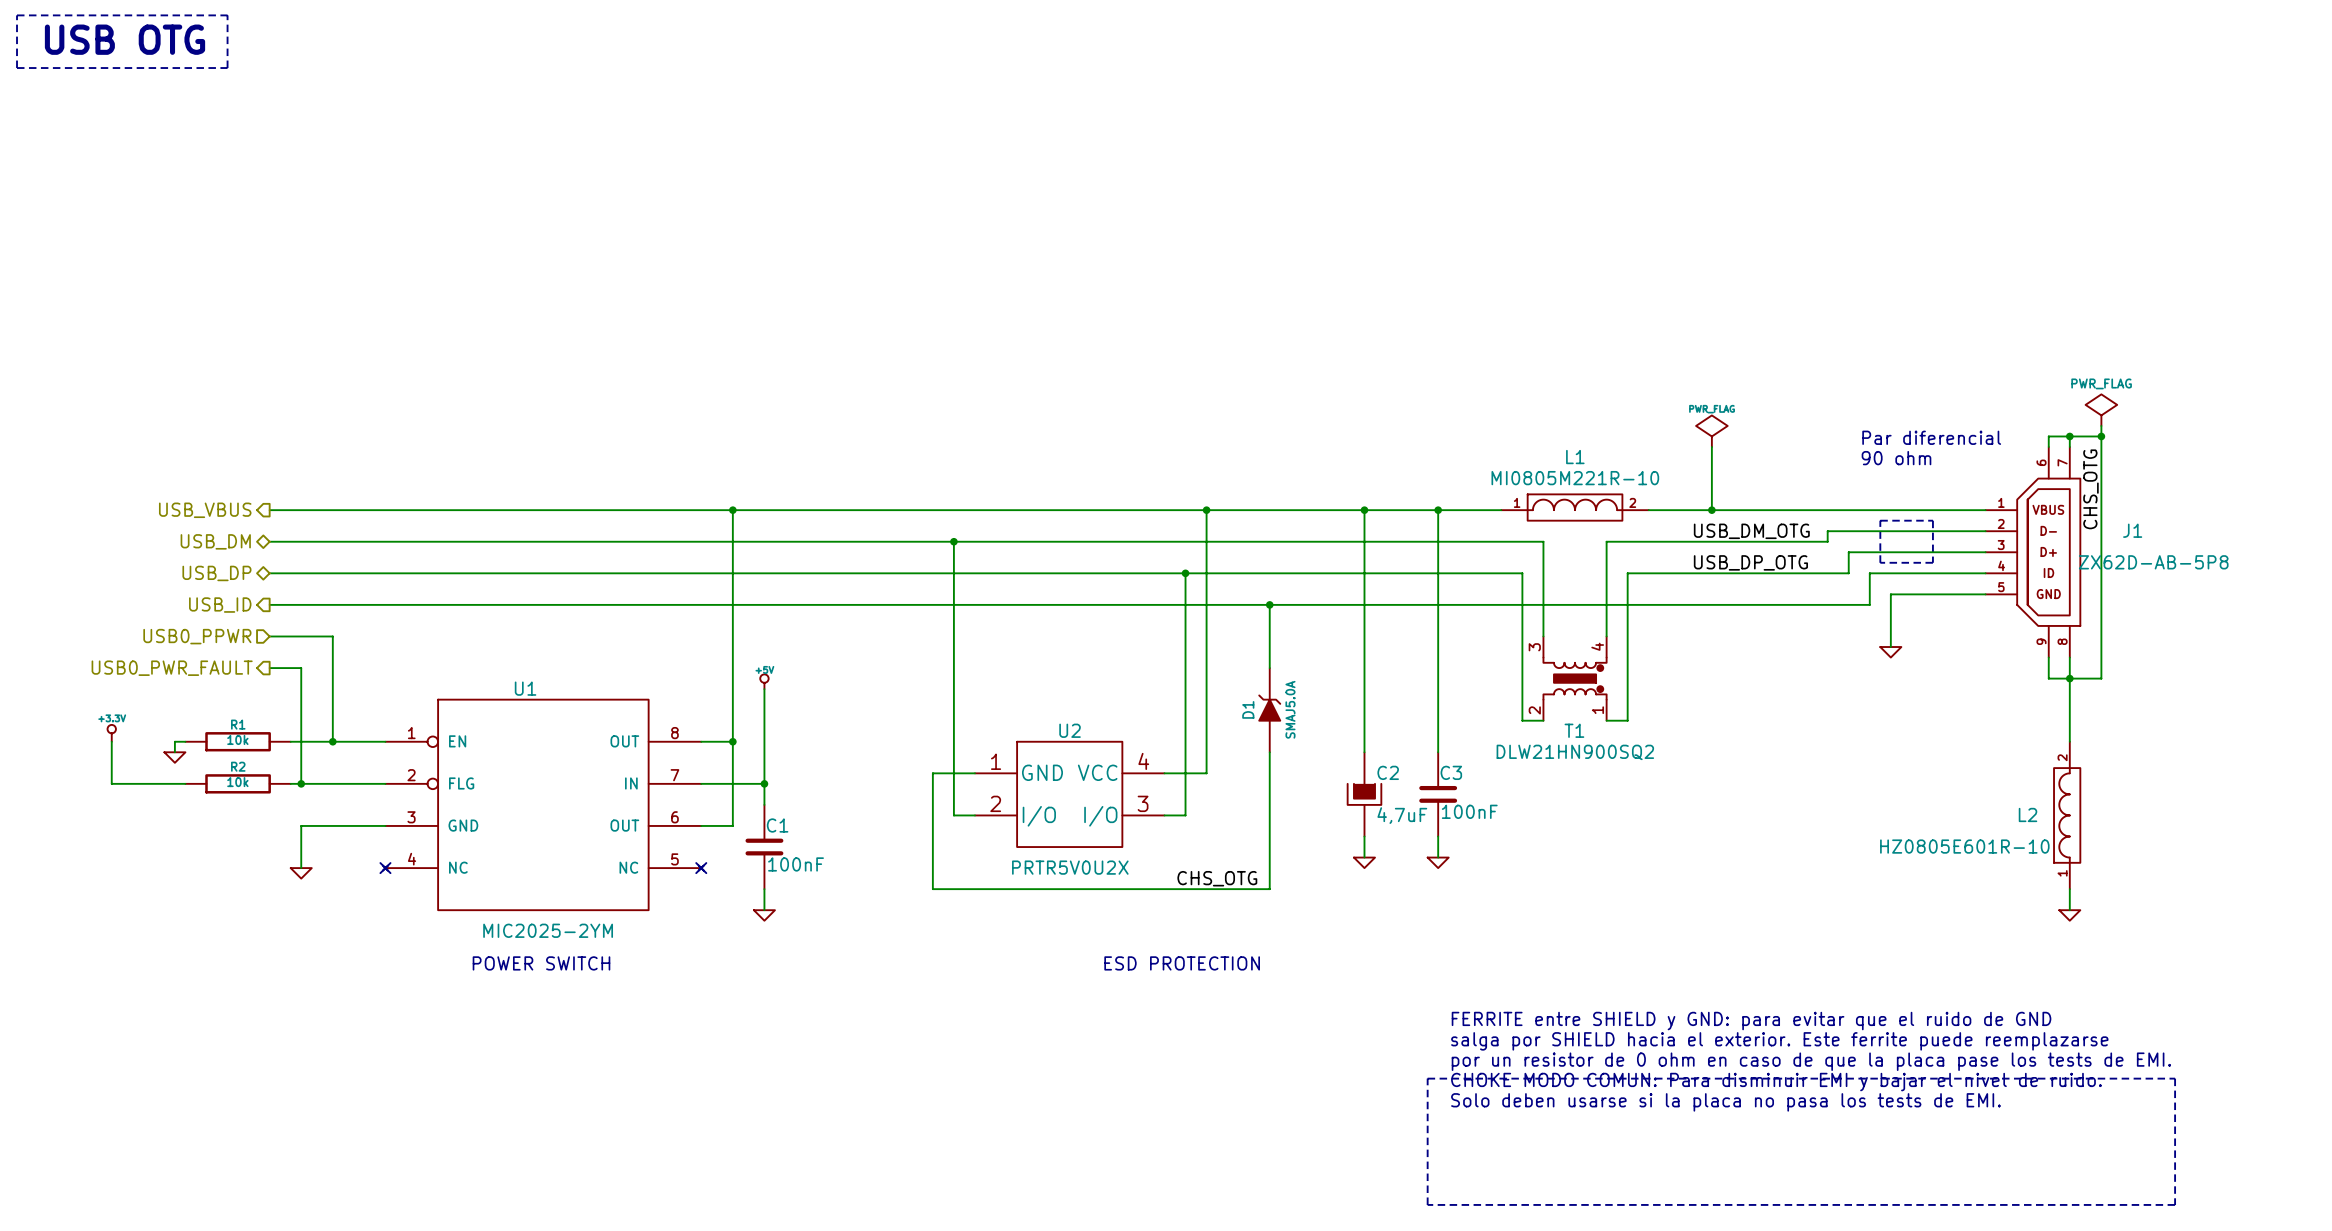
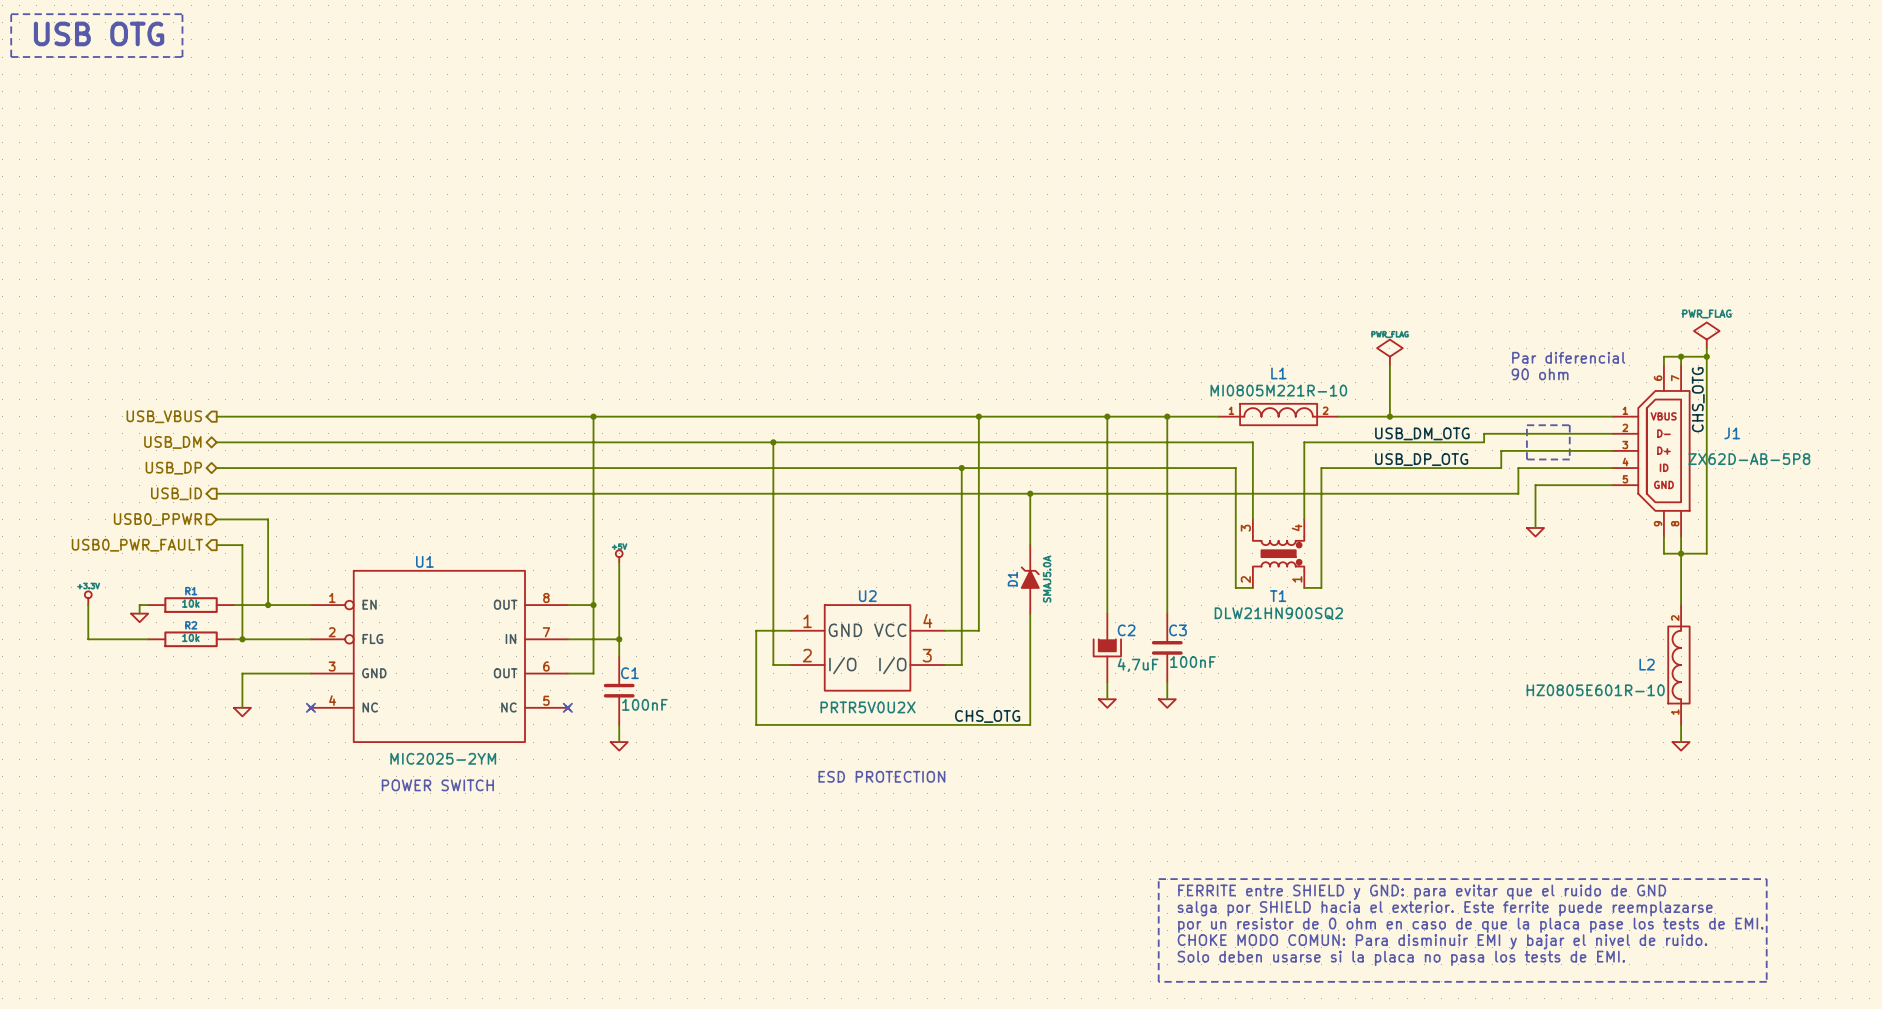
text position: ESD PROTECTION (1182, 963) -> ESD PROTECTION (881, 776)
text position: FERRITE entre SHIELD y GND: para evitar que el ruido de GND (1751, 1021) -> FERRITE entre SHIELD y GND: para evitar que el ruido de GND (1422, 892)
text position: salga por SHIELD hacia el exterior. Este ferrite puede reemplazarse (1779, 1041) -> salga por SHIELD hacia el exterior. Este ferrite puede reemplazarse (1445, 908)
text position: por un resistor de 0 ohm en caso de que la placa pase los tests de EMI. (1811, 1061) -> por un resistor de 0 ohm en caso de que la placa pase los tests de EMI. (1470, 925)
text position: CHOKE MODO COMUN: Para disminuir EMI y bajar el nivel de ruido. (1776, 1082) -> CHOKE MODO COMUN: Para disminuir EMI y bajar el nivel de ruido. (1442, 941)
text position: Solo deben usarse si la placa no pasa los tests de EMI. (1725, 1102) -> Solo deben usarse si la placa no pasa los tests de EMI. (1401, 958)

